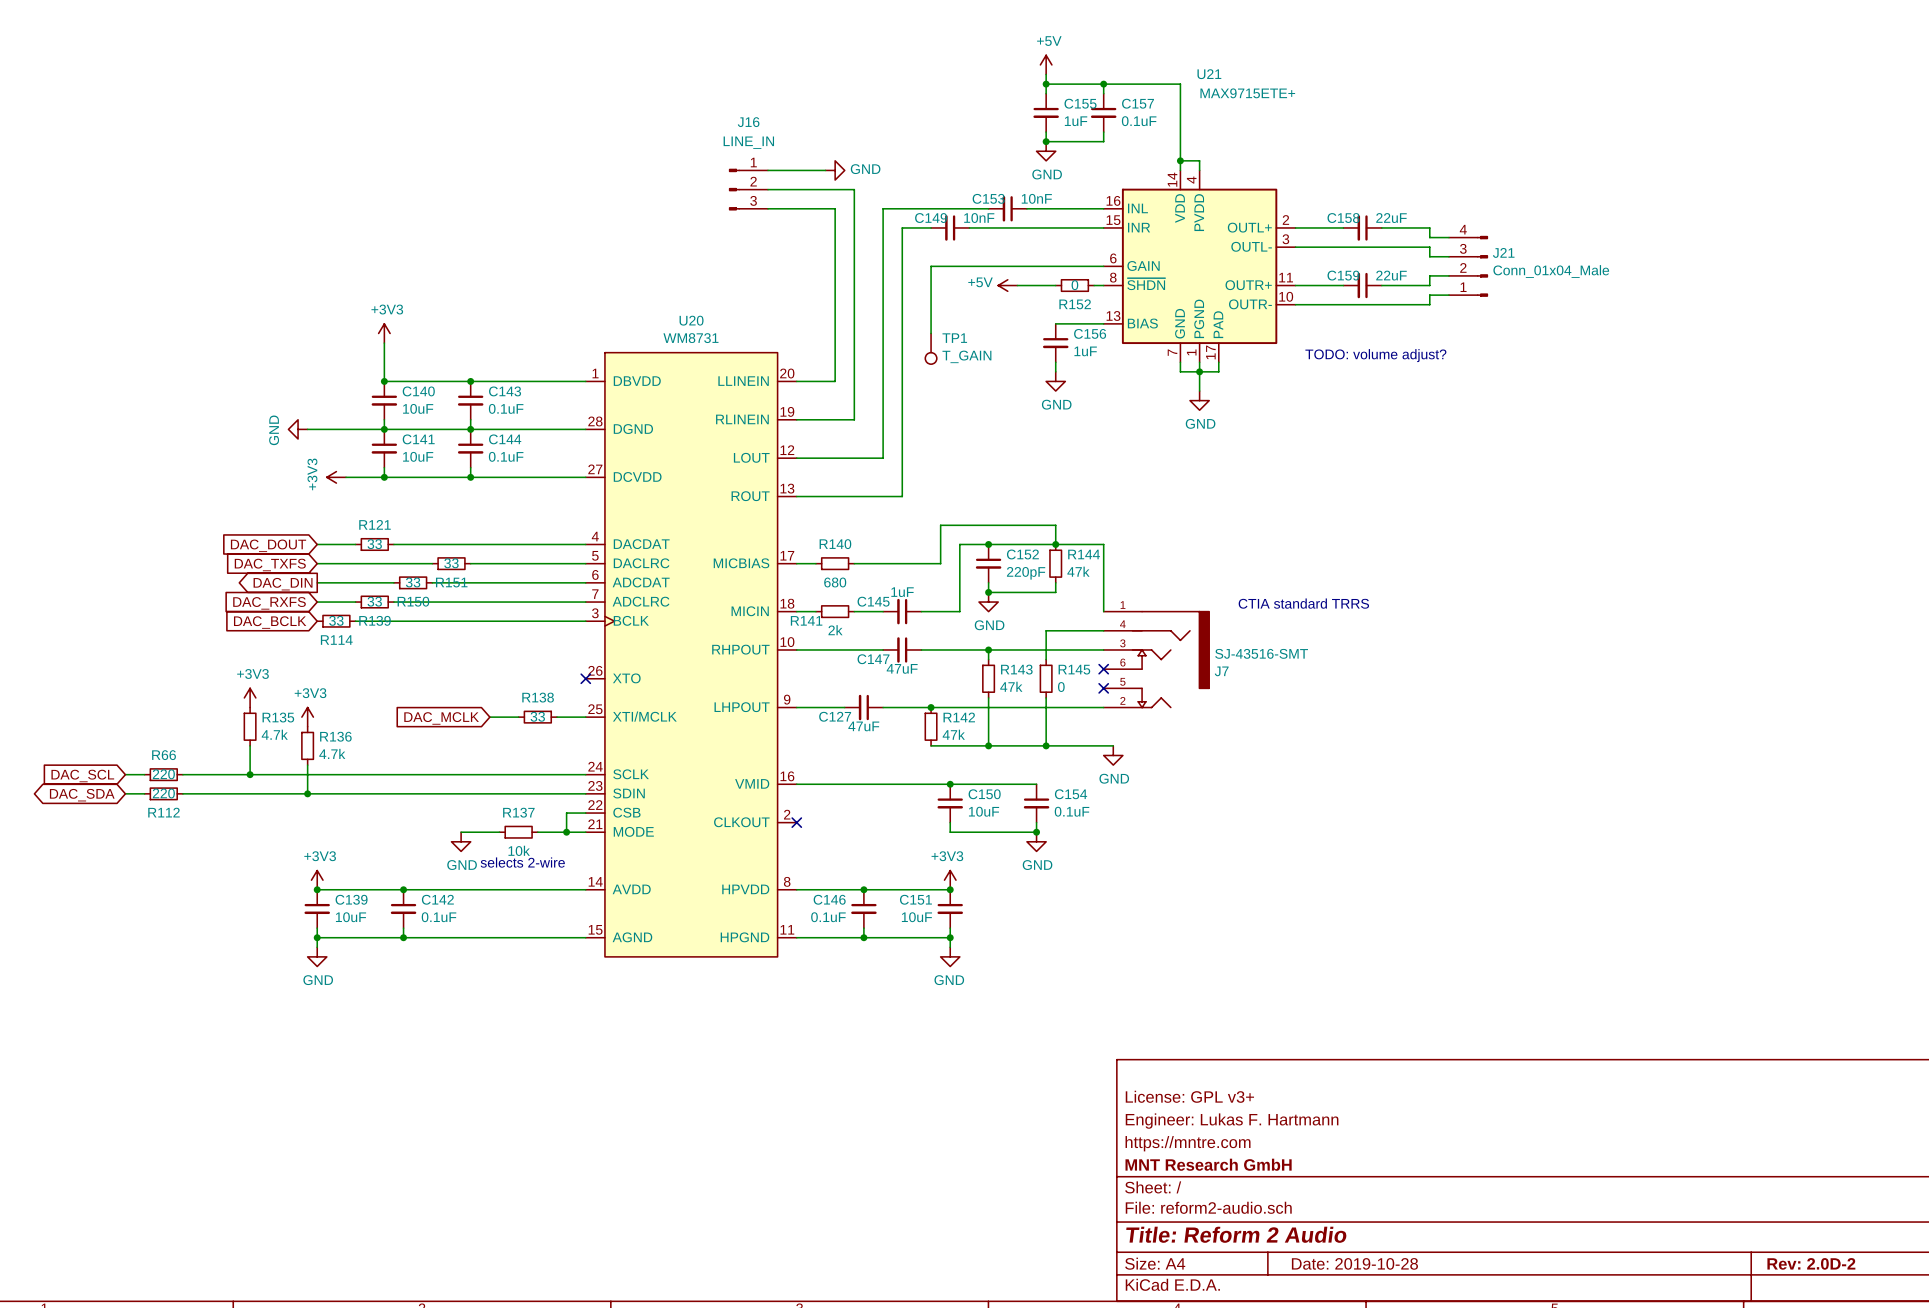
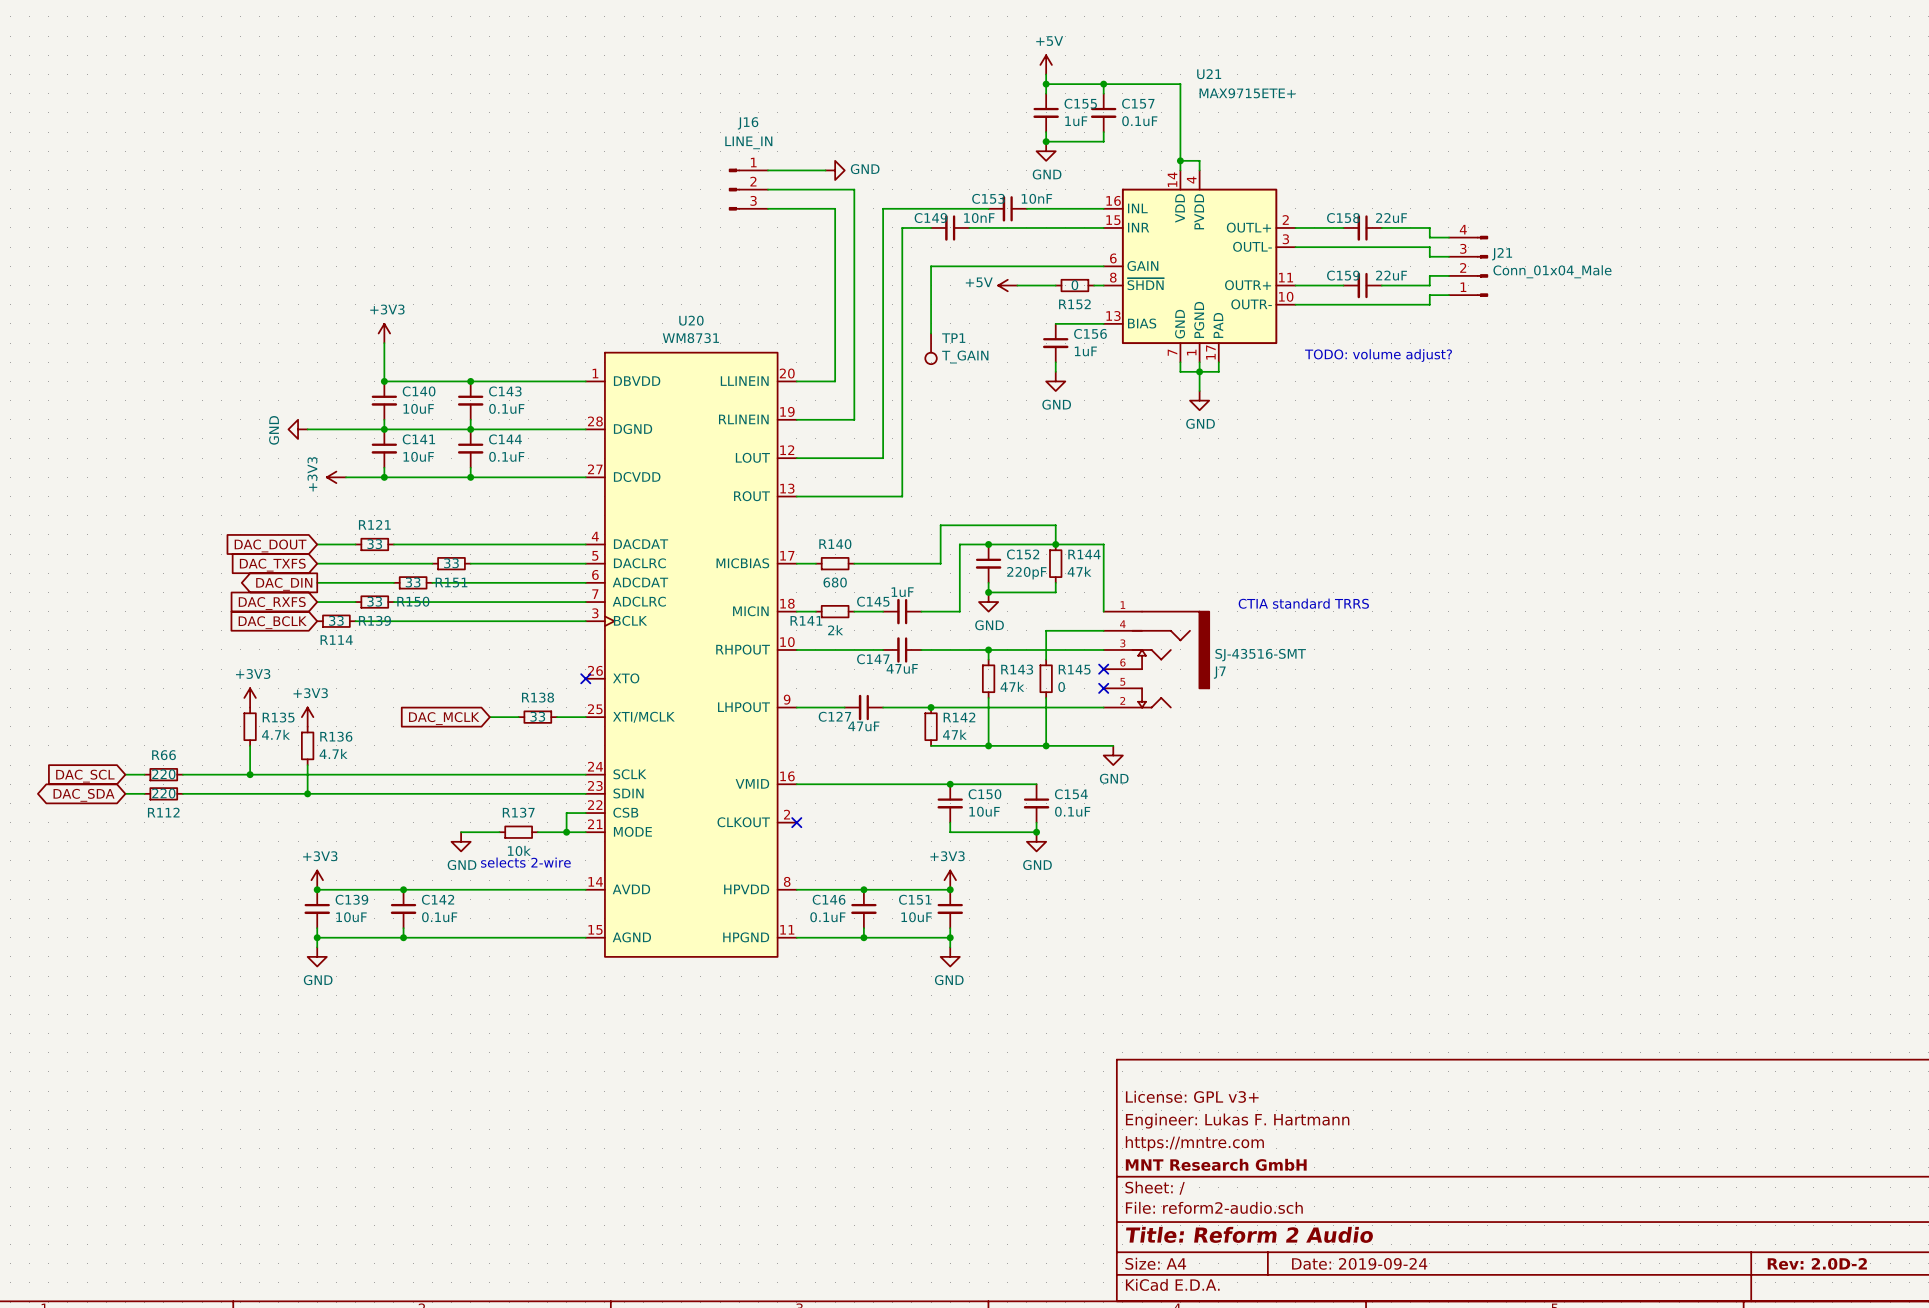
title block: Date: 2019-10-28 (1354, 1263) -> Date: 2019-09-24 (1359, 1263)

